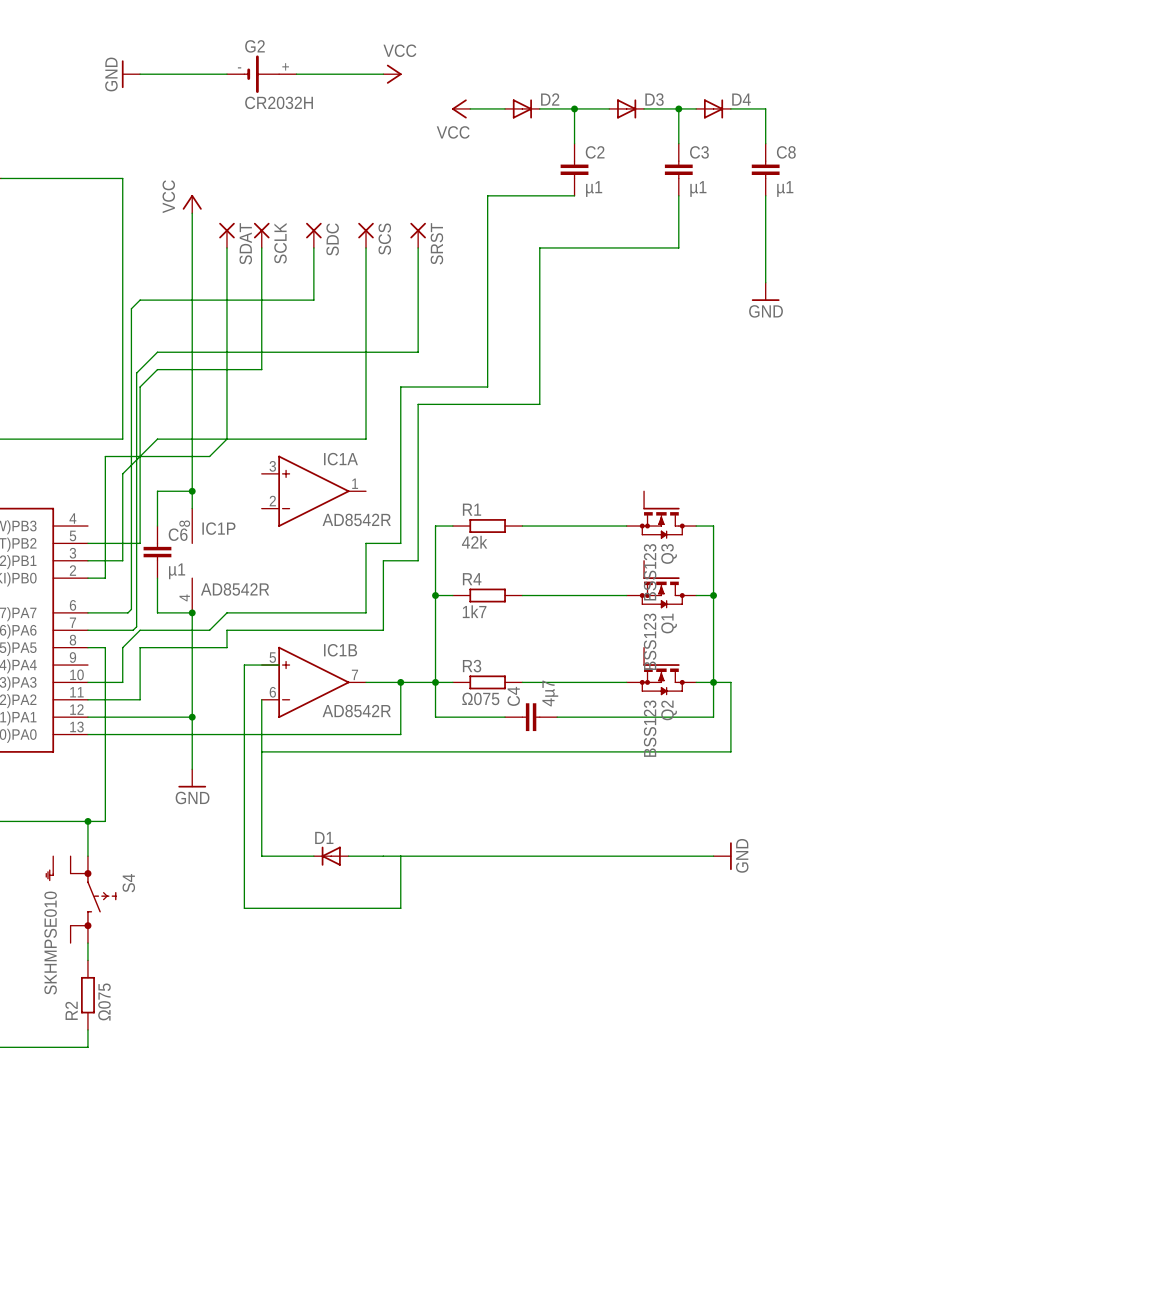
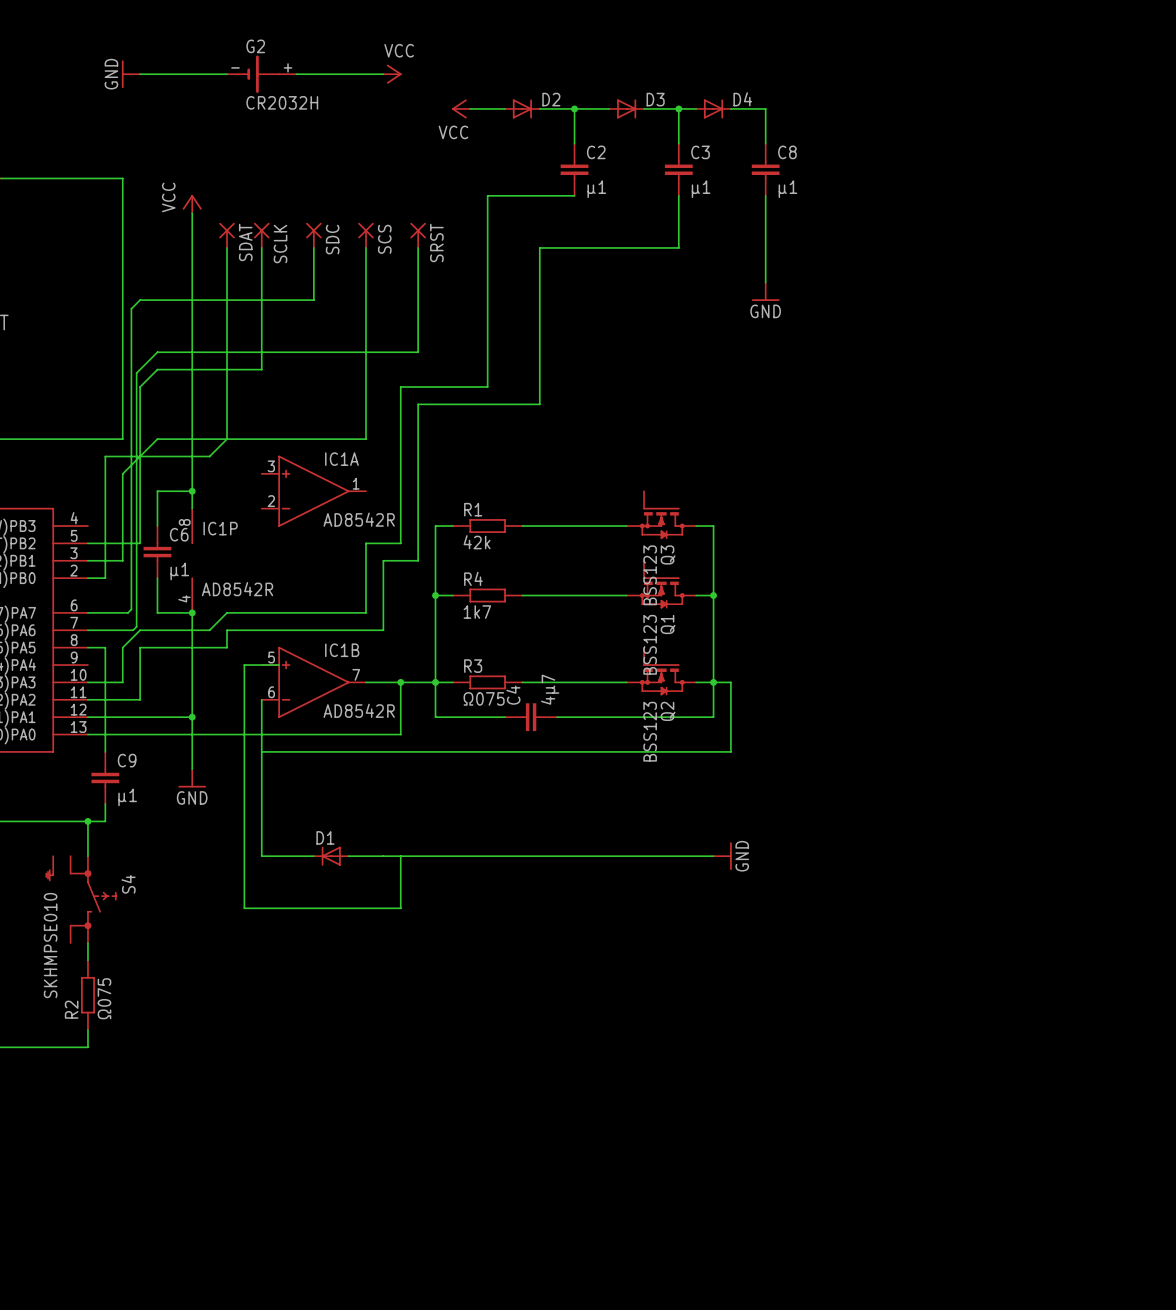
C9: none -> µ1 (105, 777)

